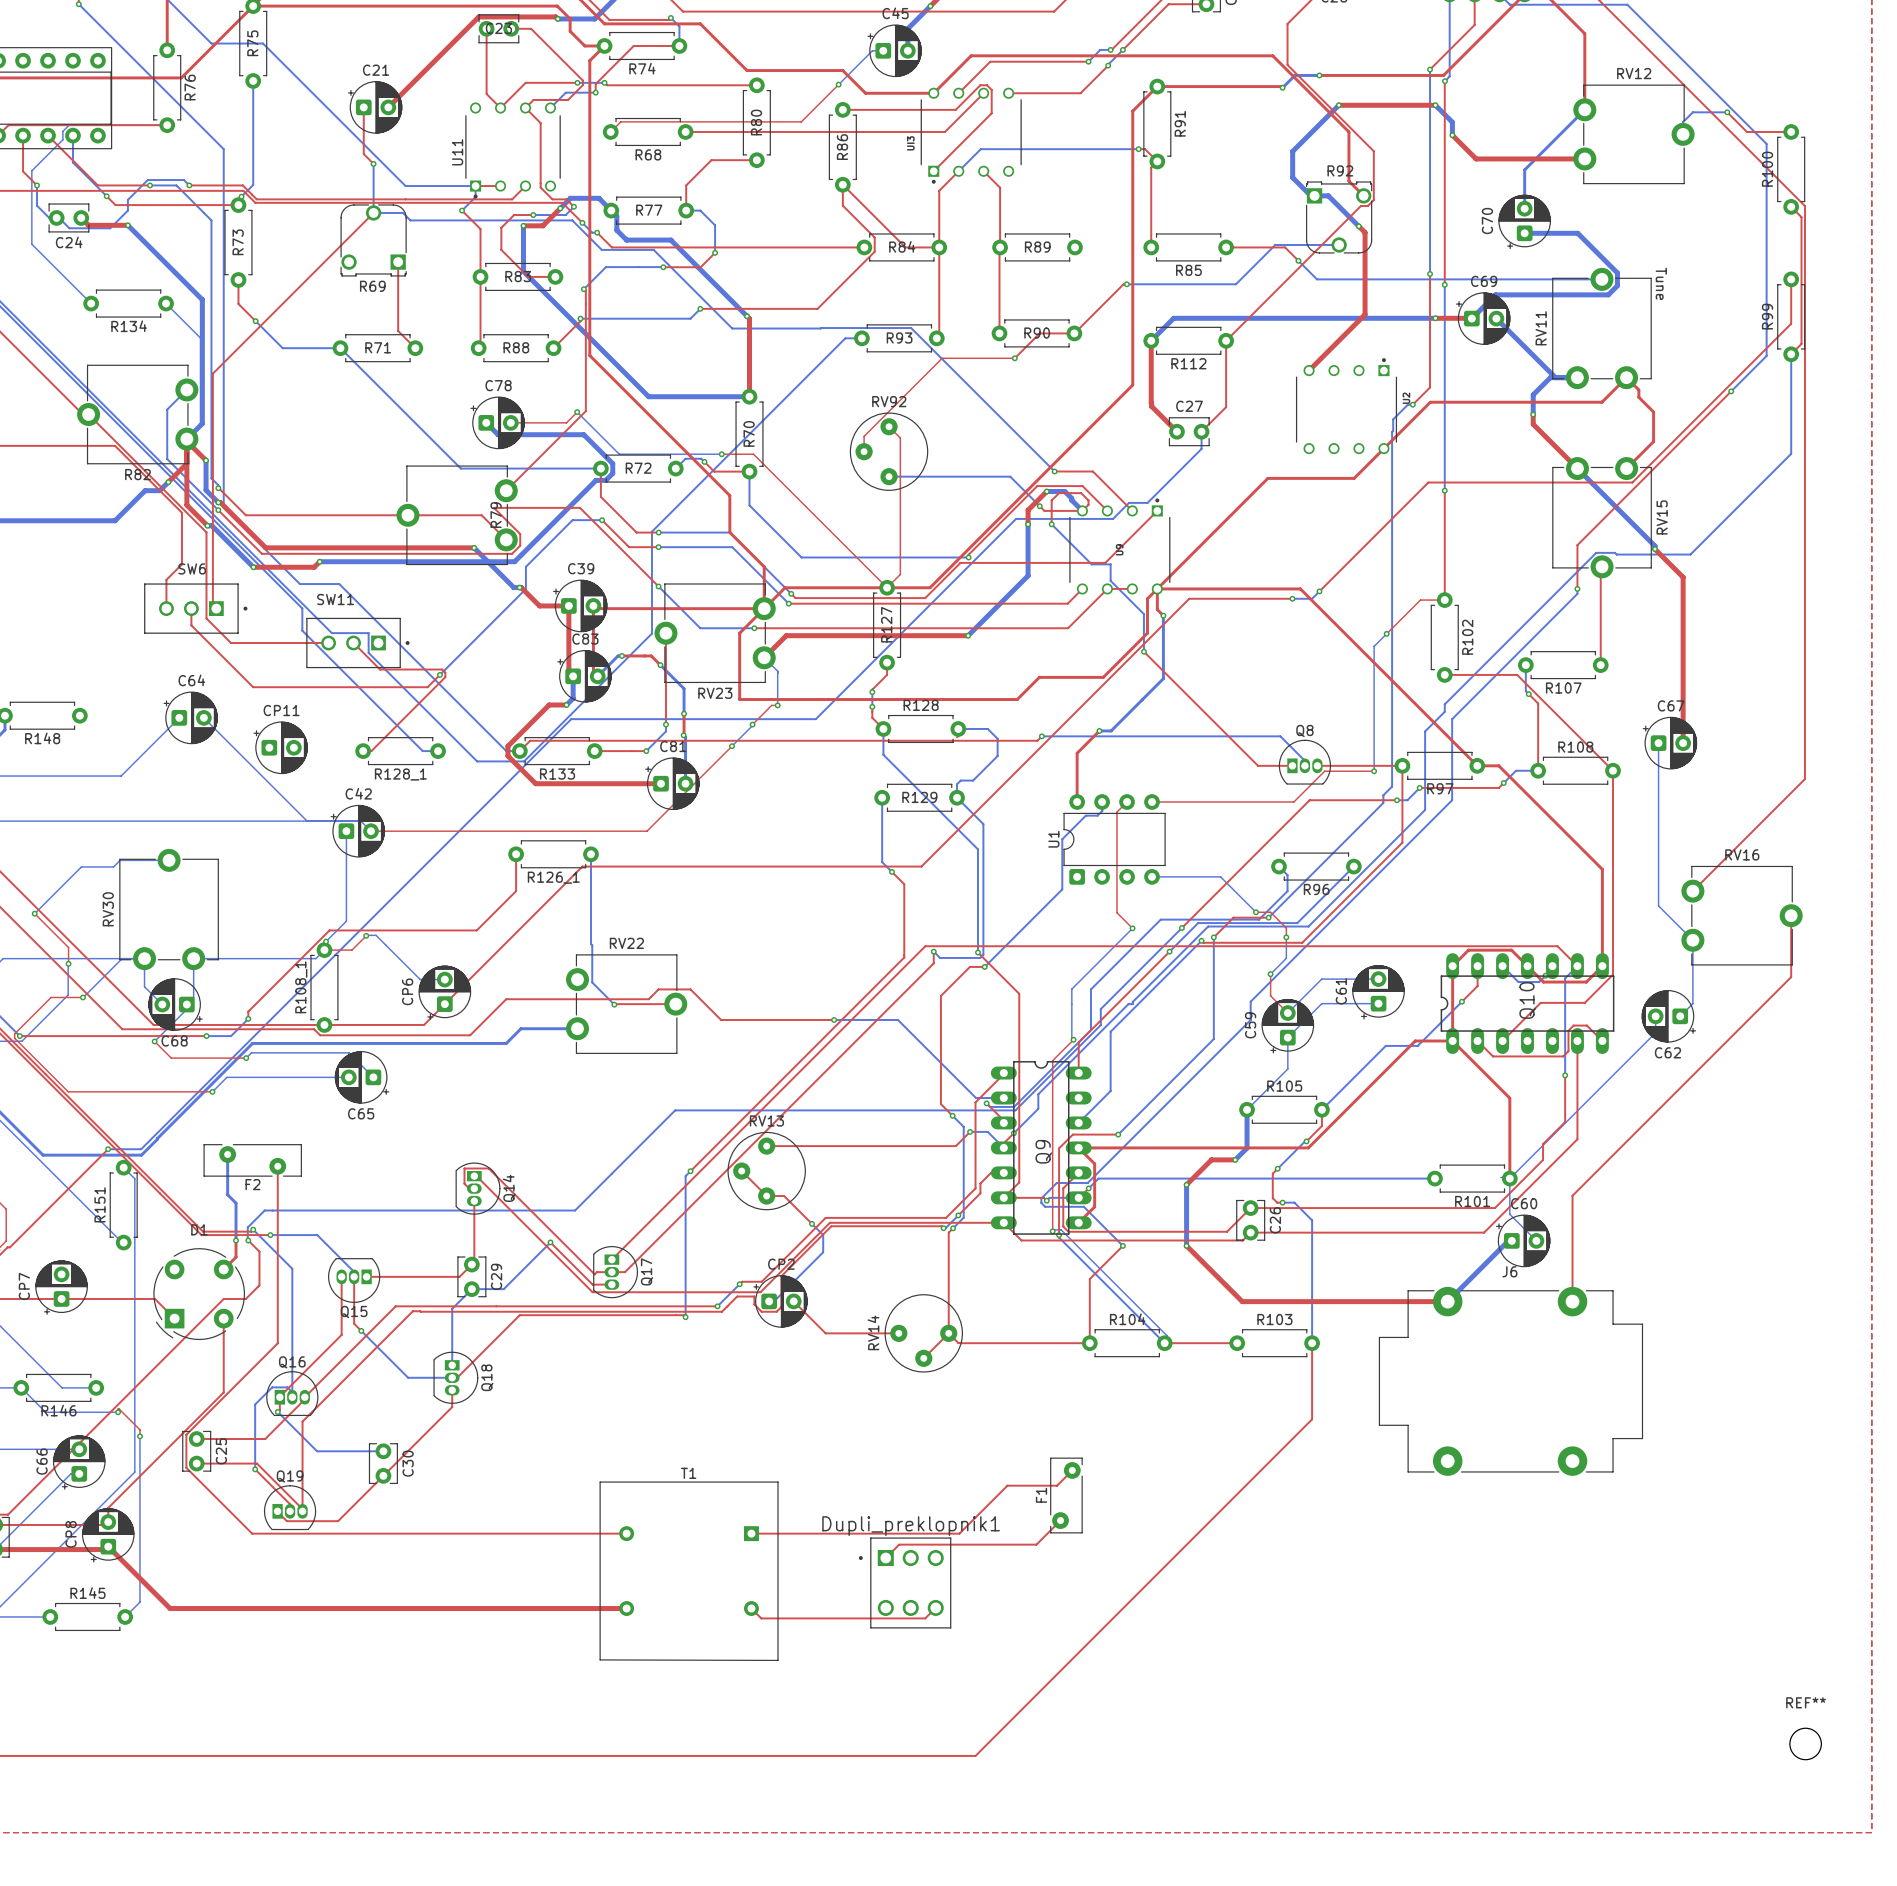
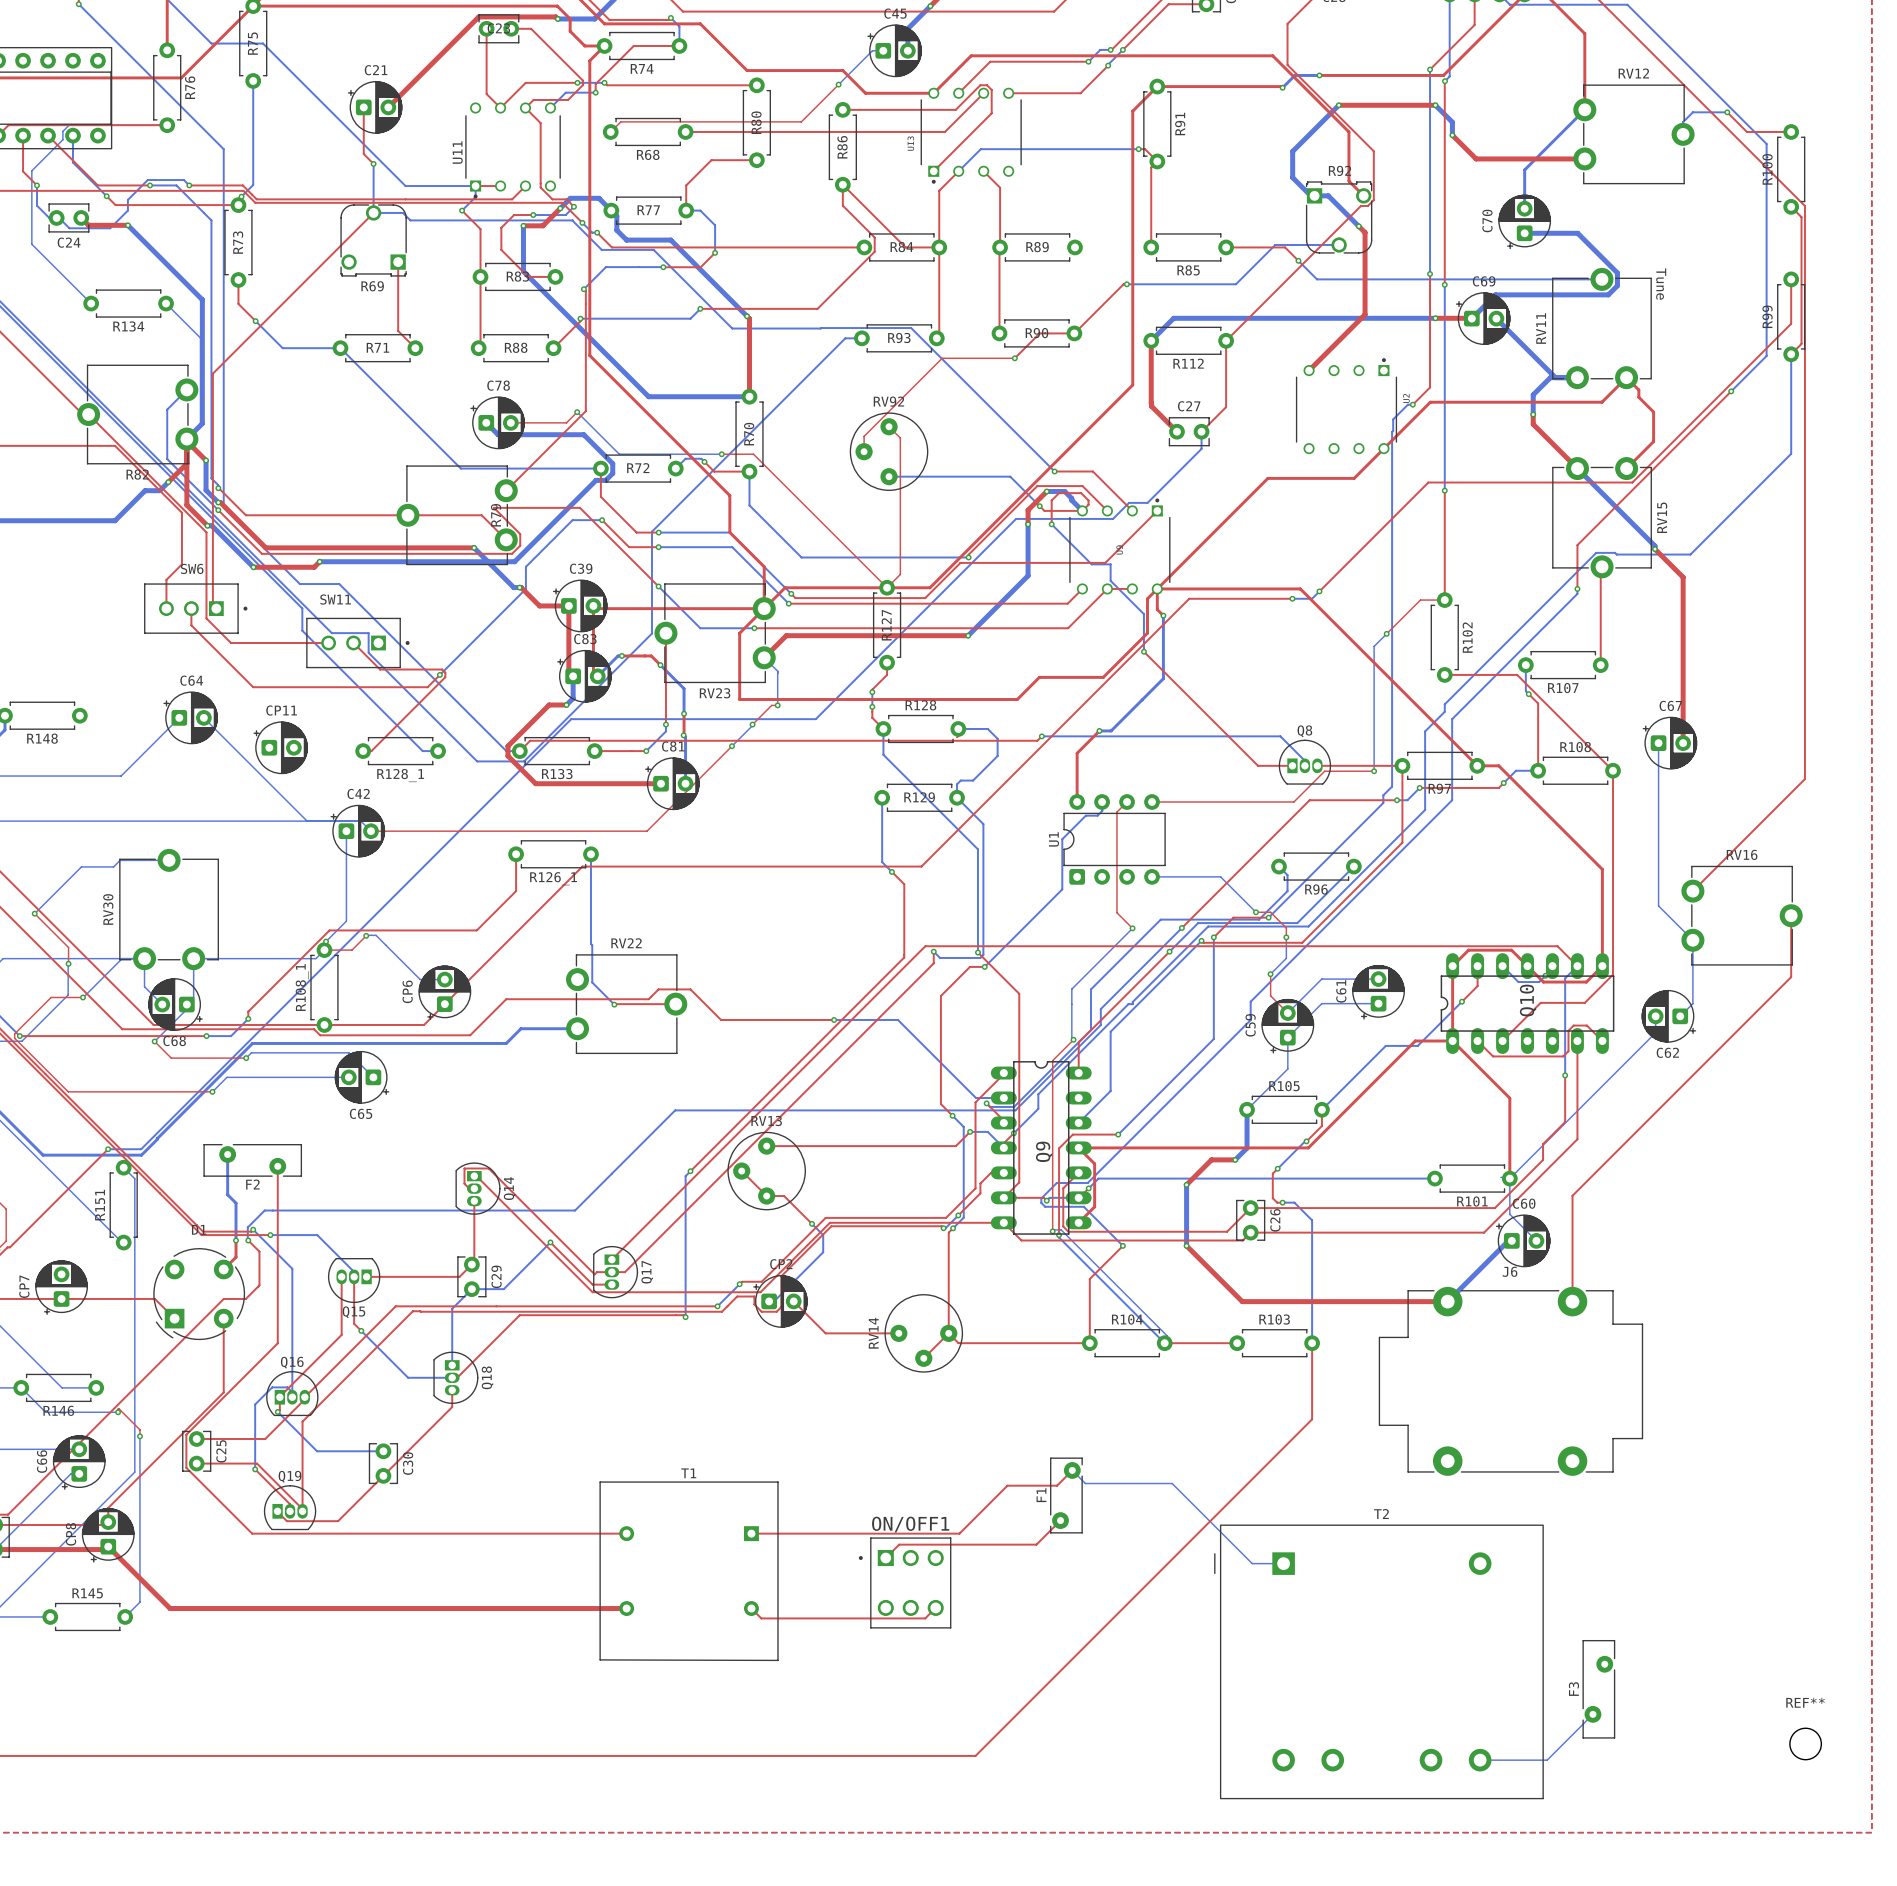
bottom track: none -> (1072, 1470) (1085, 1483) (1172, 1483) (1252, 1563) (1283, 1563)
Dupli_preklopnik1 name: Dupli_preklopnik1 (911, 1526) -> ON/OFF1 (910, 1524)
T2: none -> (1378, 1661)
F3: none -> (1598, 1689)
bottom track: none -> (1592, 1714) (1547, 1760) (1480, 1760)

